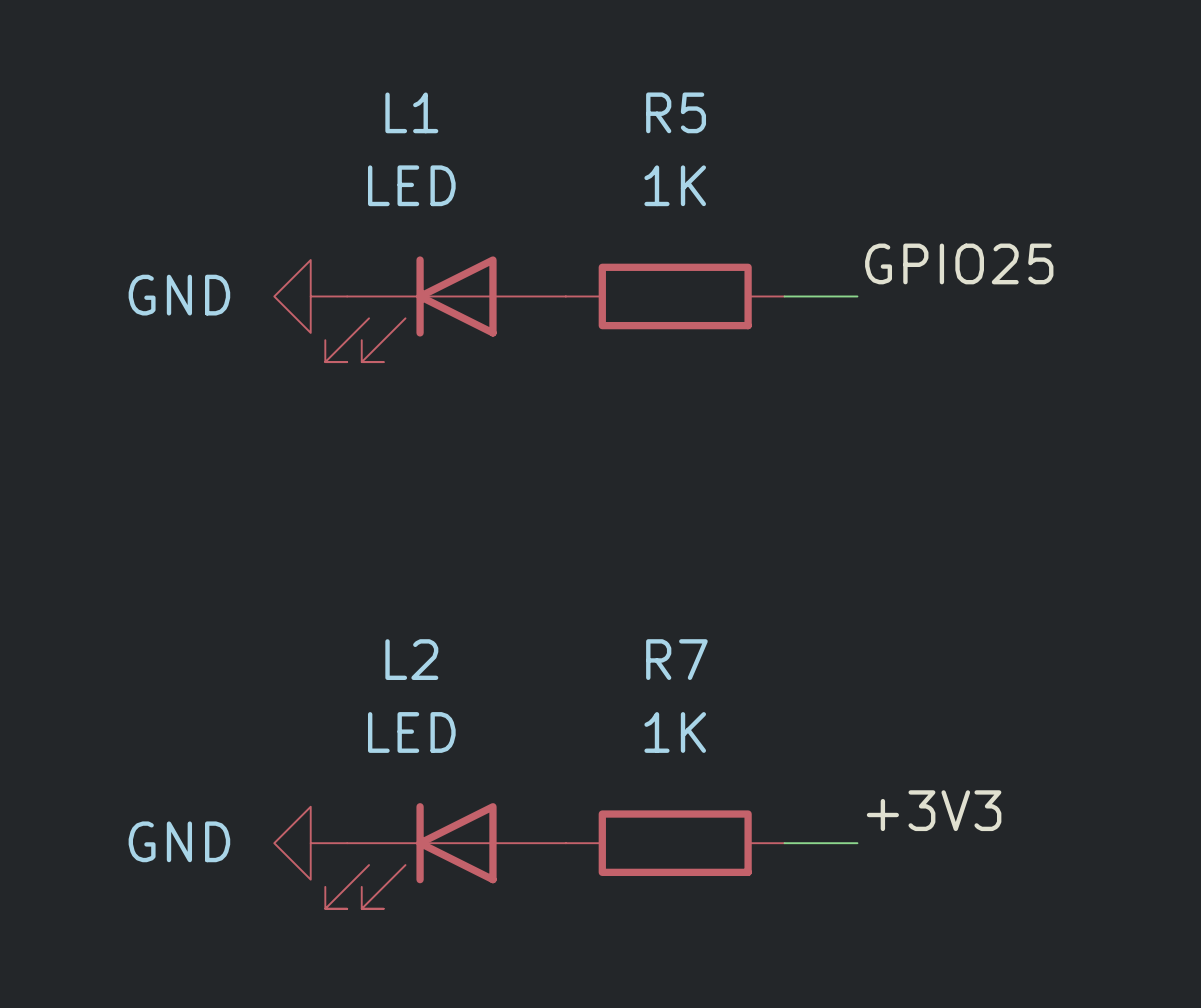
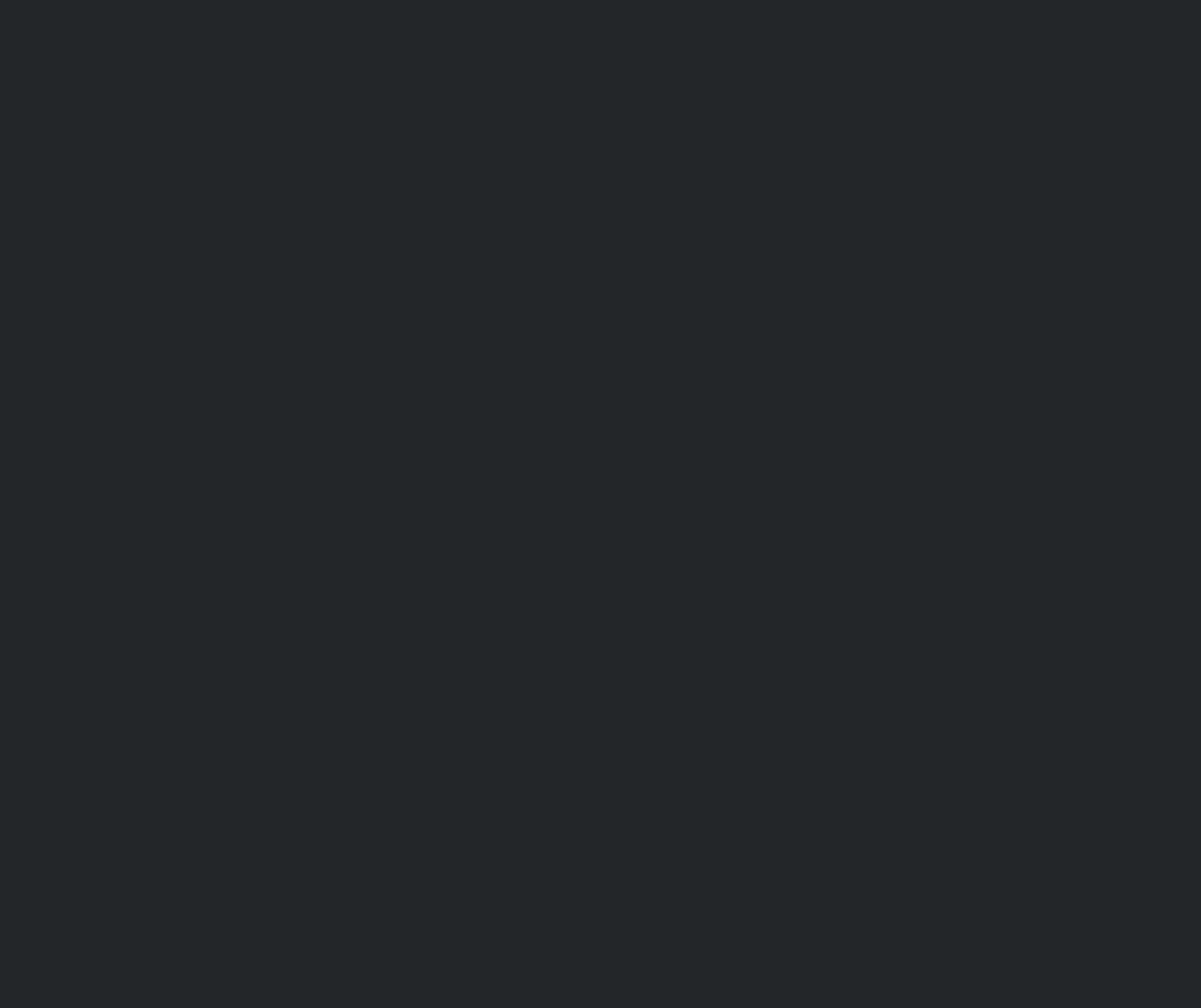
label: GPIO25 (959, 263) -> none
power symbol: GND (310, 296) -> none
R5: 1K (675, 296) -> none
wire: (784, 296) (857, 296) -> none
L1: LED (445, 309) -> none
label: +3V3 (934, 810) -> none
power symbol: GND (310, 843) -> none
R7: 1K (675, 843) -> none
wire: (784, 843) (857, 843) -> none
L2: LED (445, 855) -> none

